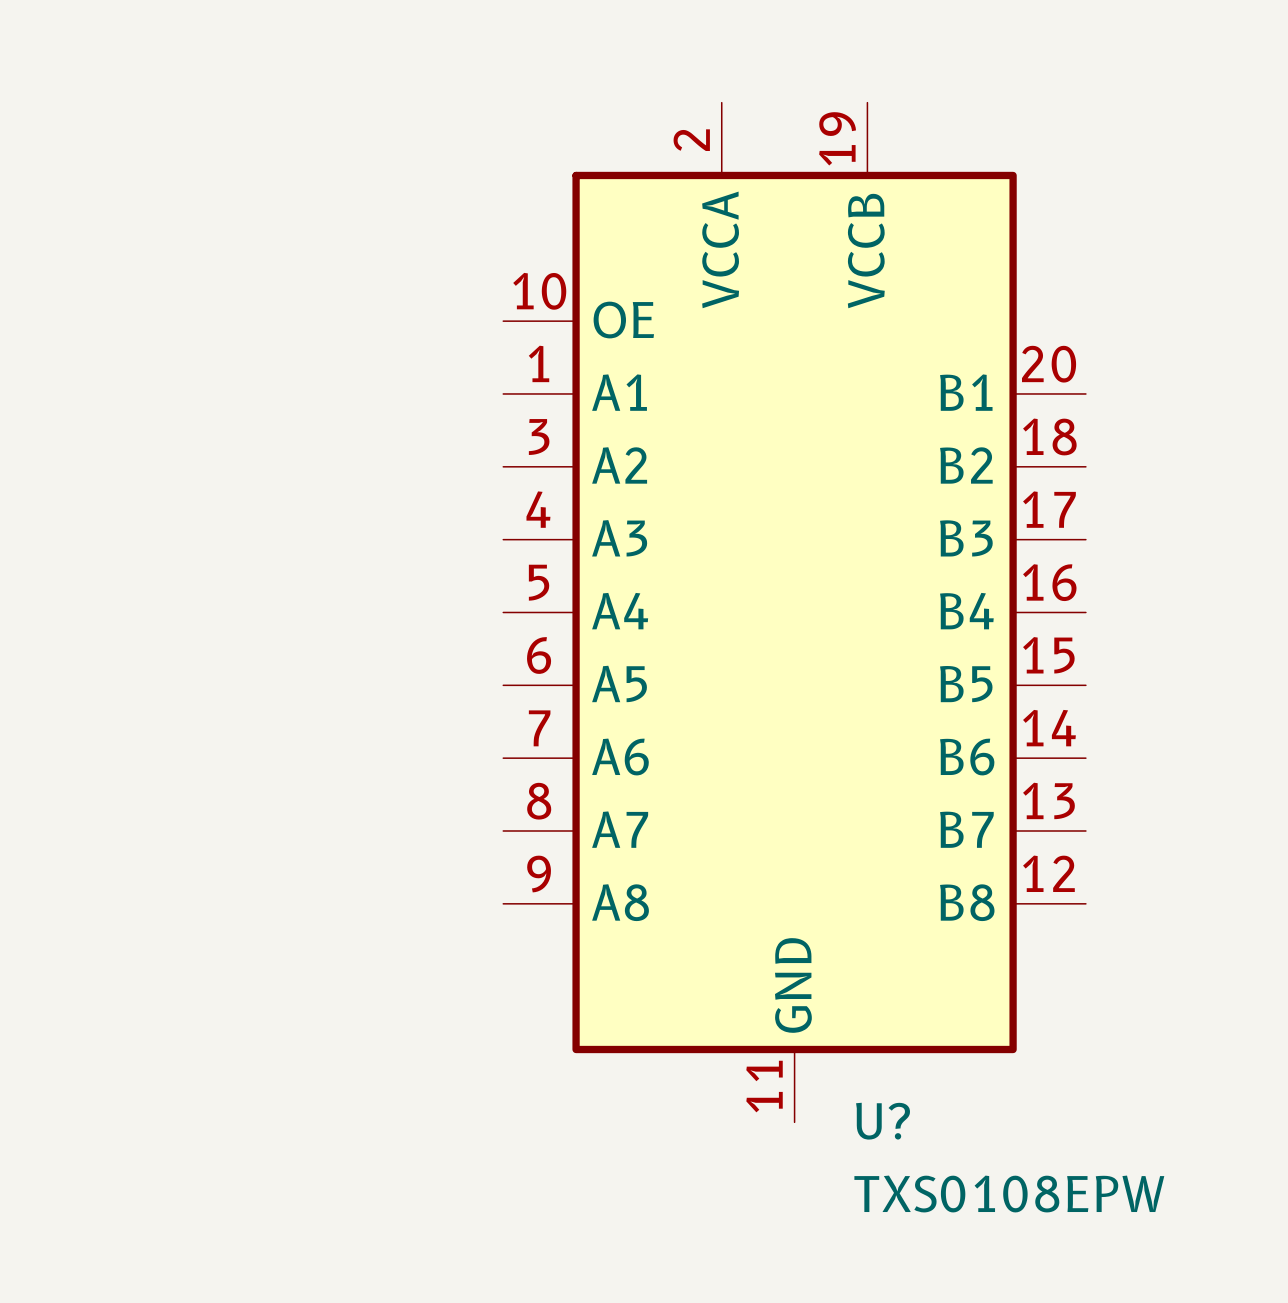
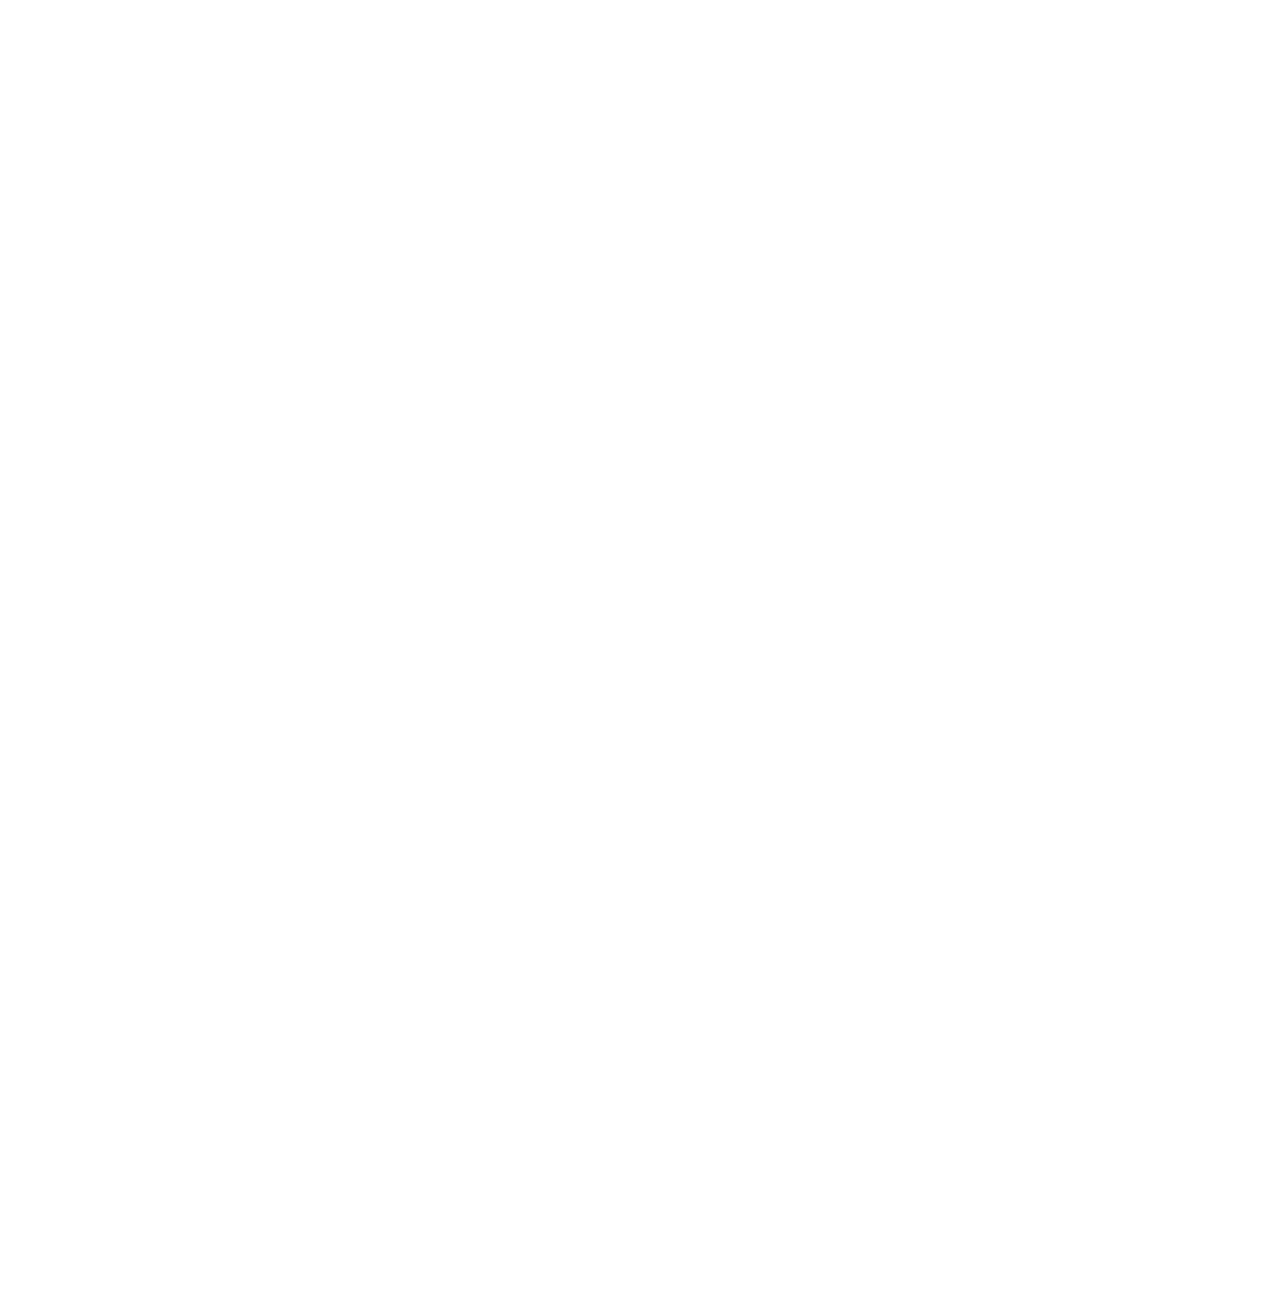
U?: TXS0108EPW (794, 612) -> none

